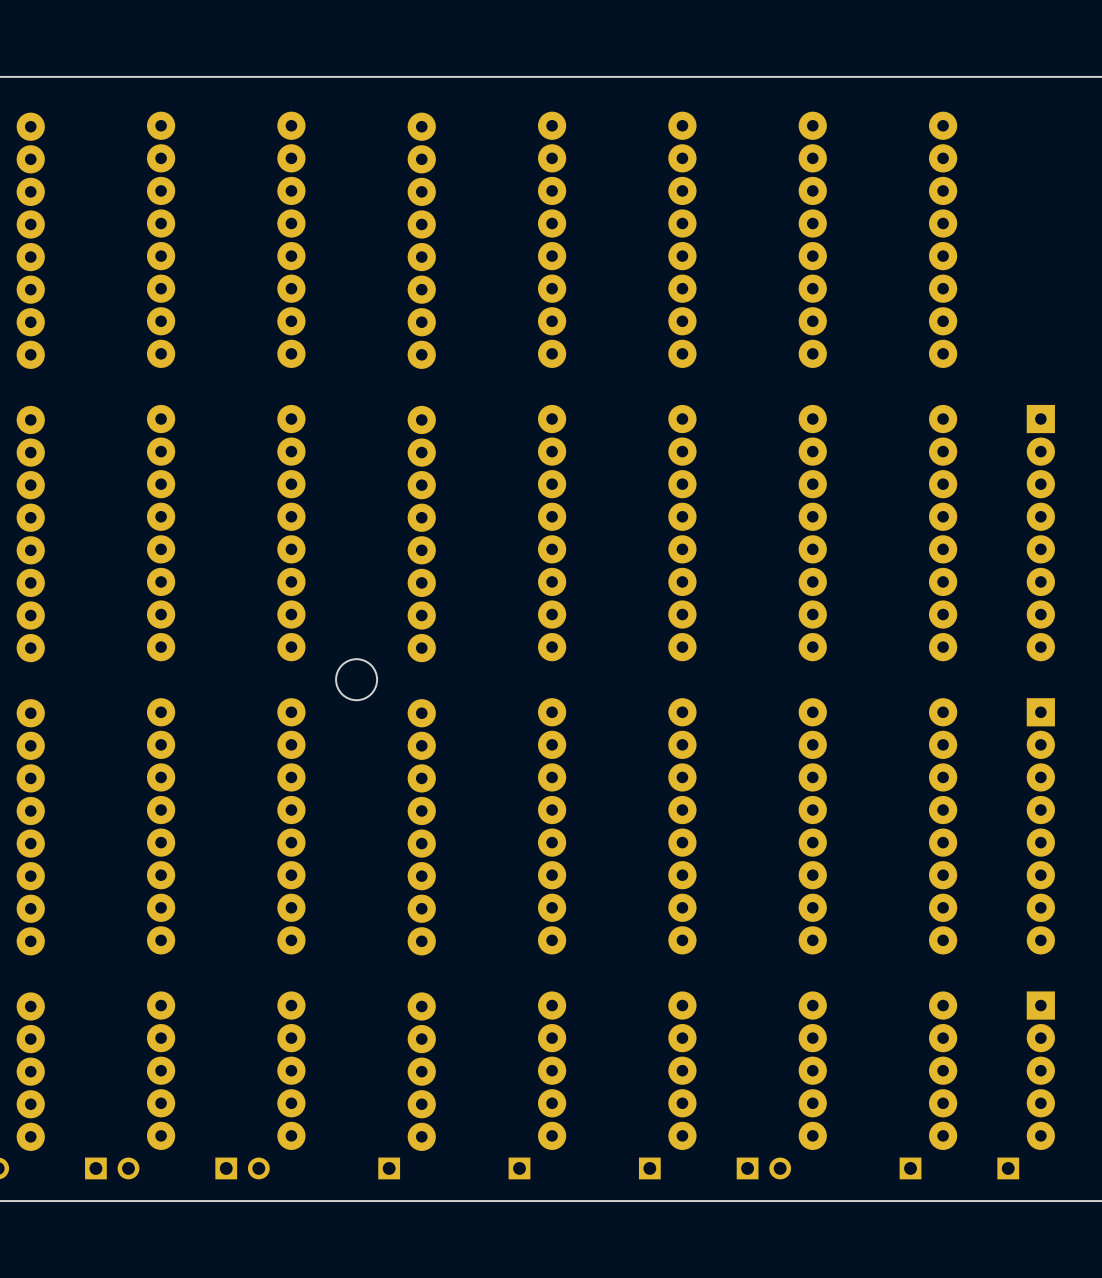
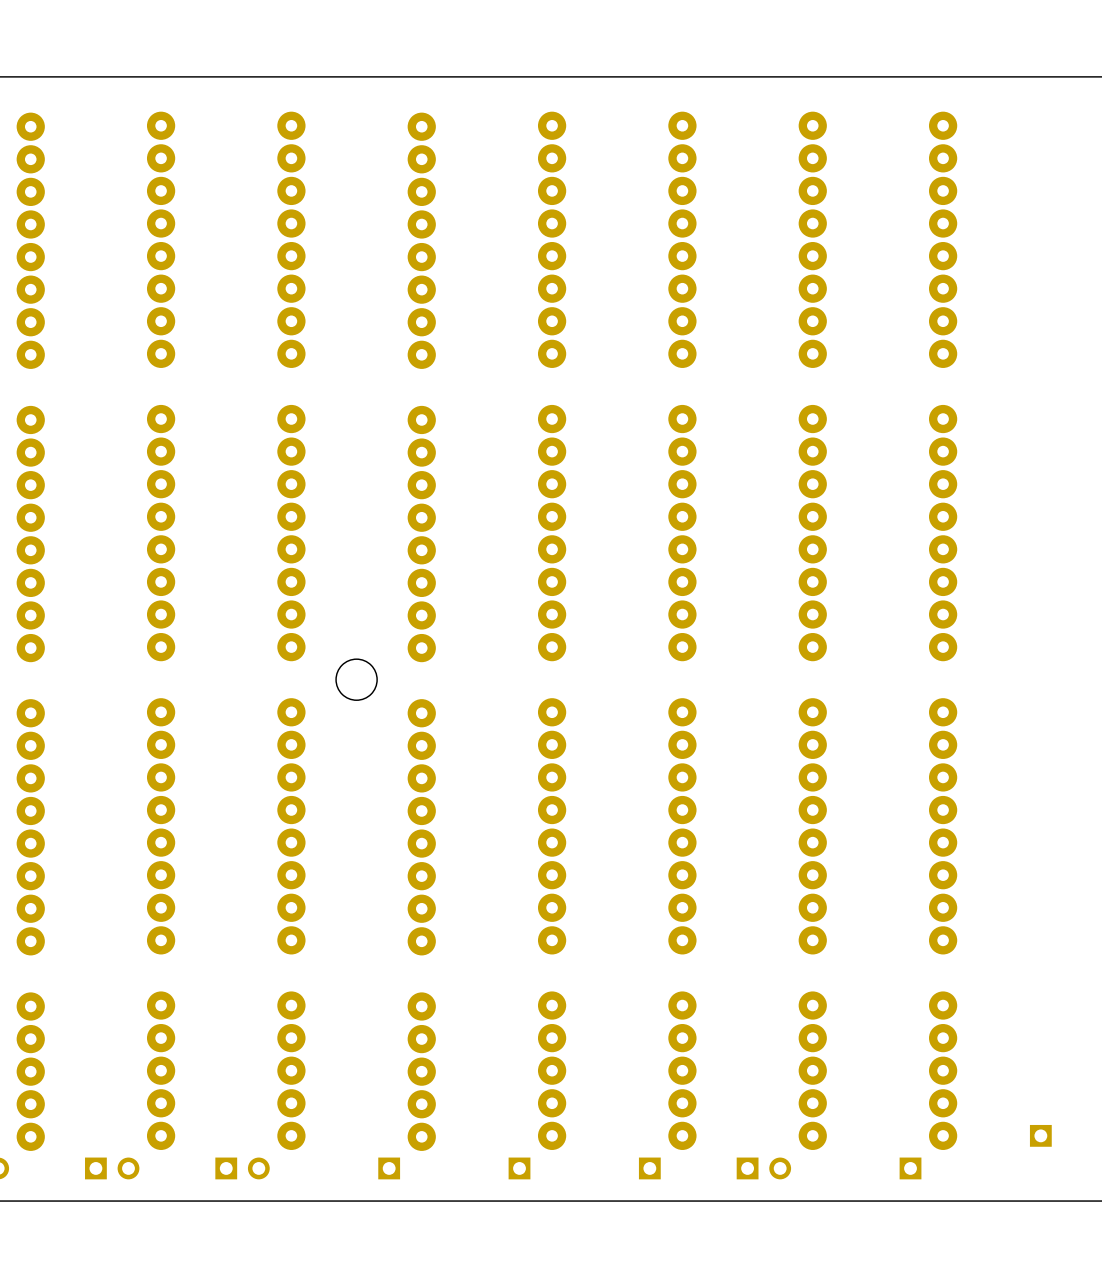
part: (1040, 533) -> none
part: (1040, 826) -> none
part: (1040, 1070) -> none
part position: (1008, 1168) -> (1040, 1135)

